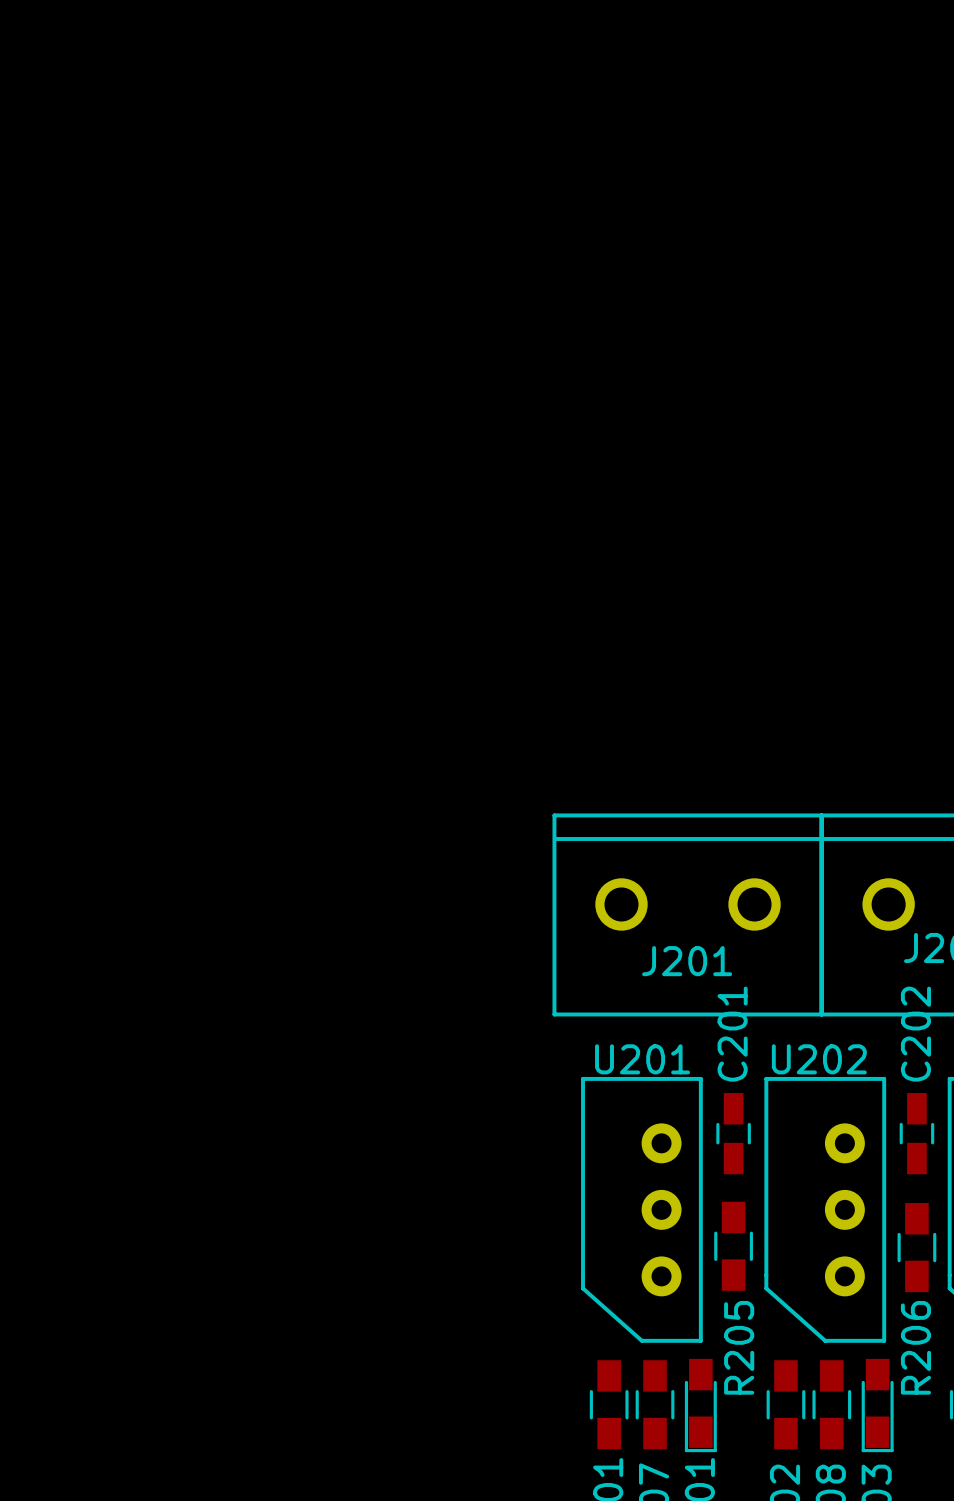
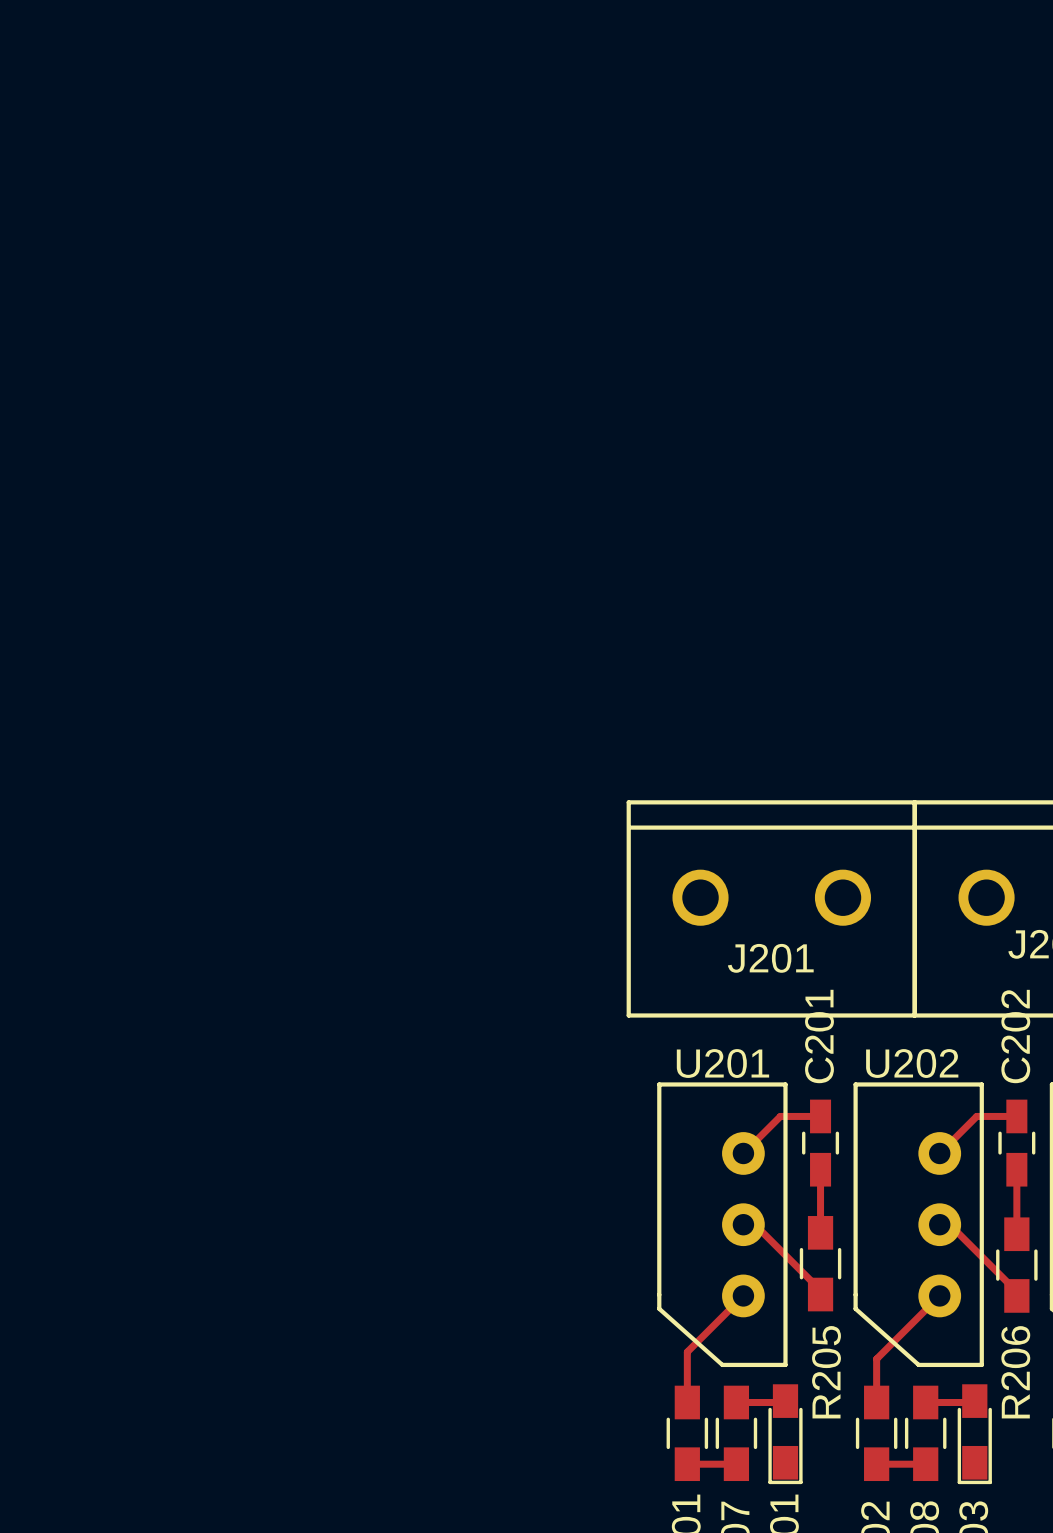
track: none -> (820, 1116) (780, 1116) (743, 1153)
track: none -> (1016, 1116) (976, 1116) (939, 1153)
track: none -> (820, 1169) (820, 1232)
track: none -> (1016, 1169) (1016, 1234)
track: none -> (743, 1224) (754, 1224) (820, 1290) (820, 1294)
track: none -> (939, 1224) (949, 1224) (1016, 1291) (1016, 1295)
track: none -> (743, 1295) (687, 1352) (687, 1402)
track: none -> (939, 1295) (876, 1359) (876, 1402)
track: none -> (785, 1401) (736, 1402)
track: none -> (974, 1401) (925, 1402)
track: none -> (687, 1464) (736, 1464)
track: none -> (876, 1464) (925, 1464)

